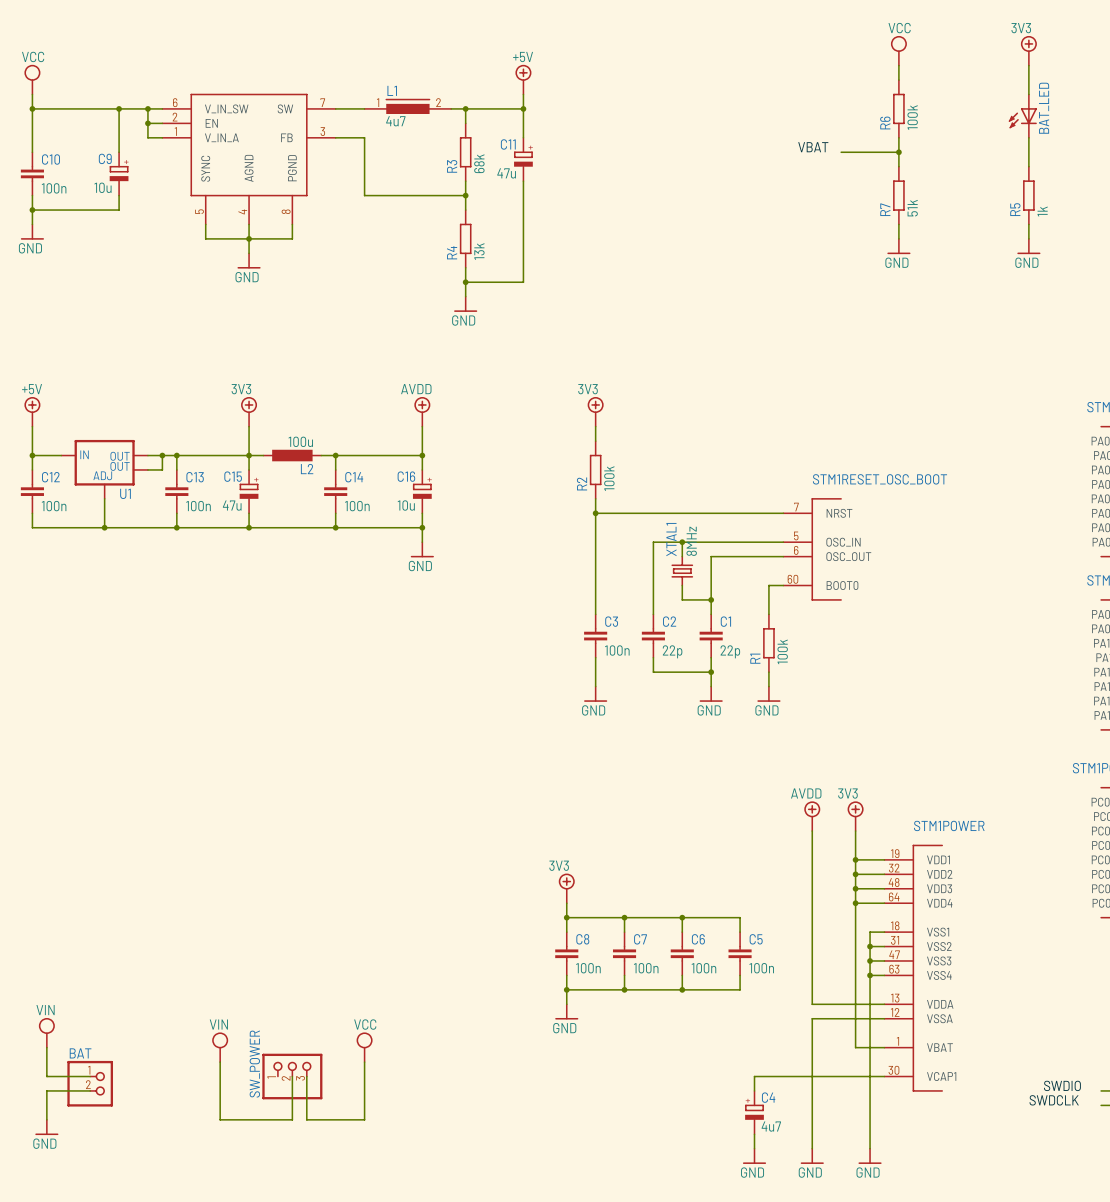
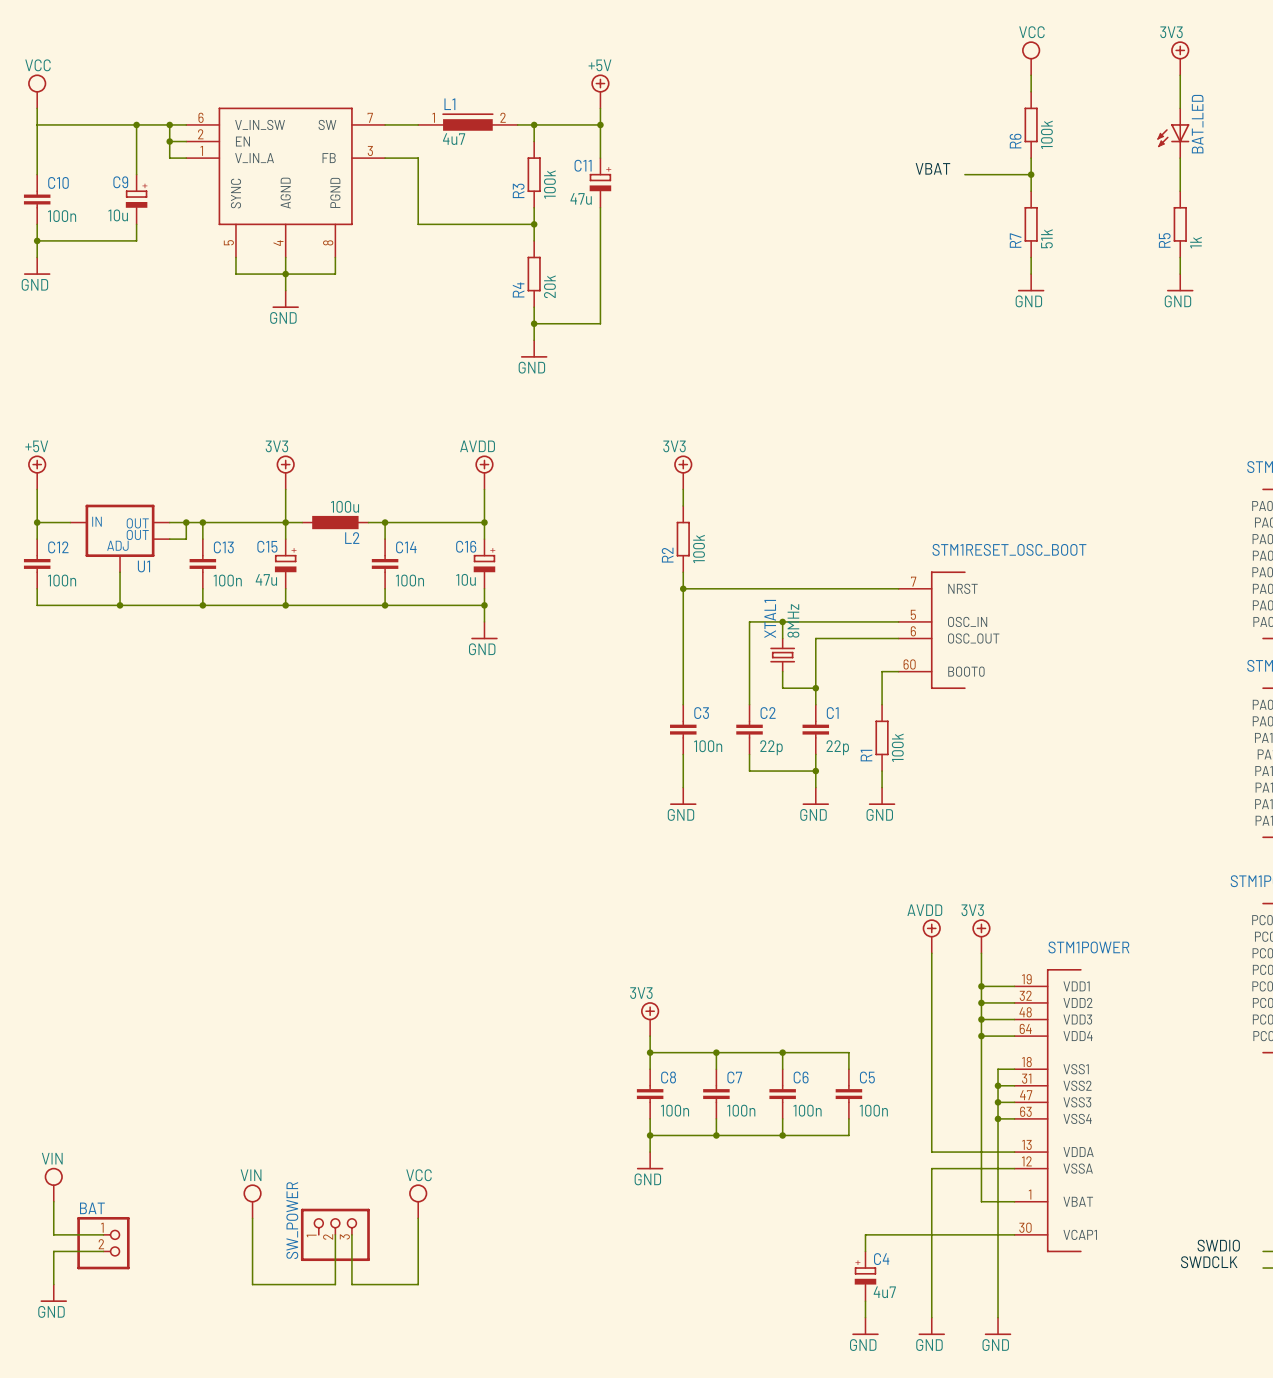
junction: (32, 108) -> none
R3 value: 68k (479, 163) -> 100k (549, 184)
R4 value: 13k (479, 251) -> 20k (549, 286)

